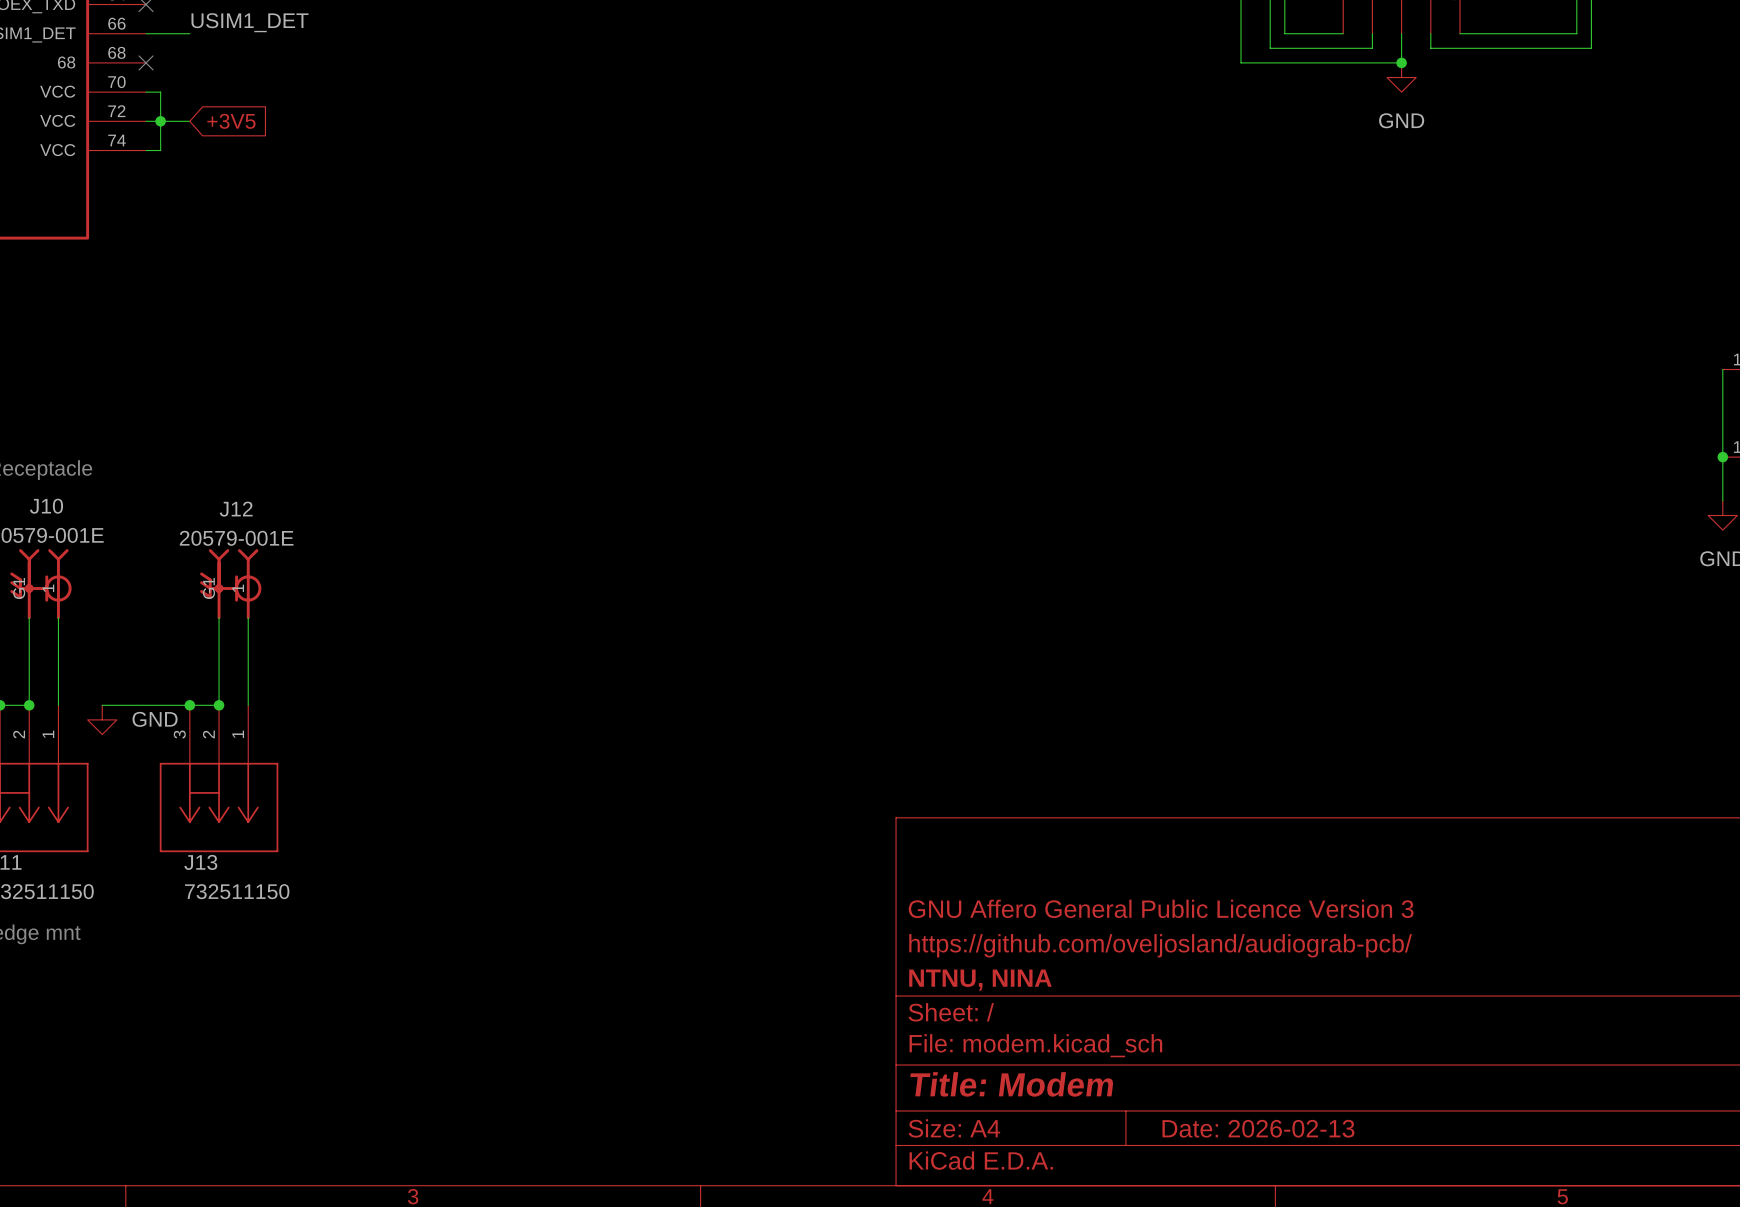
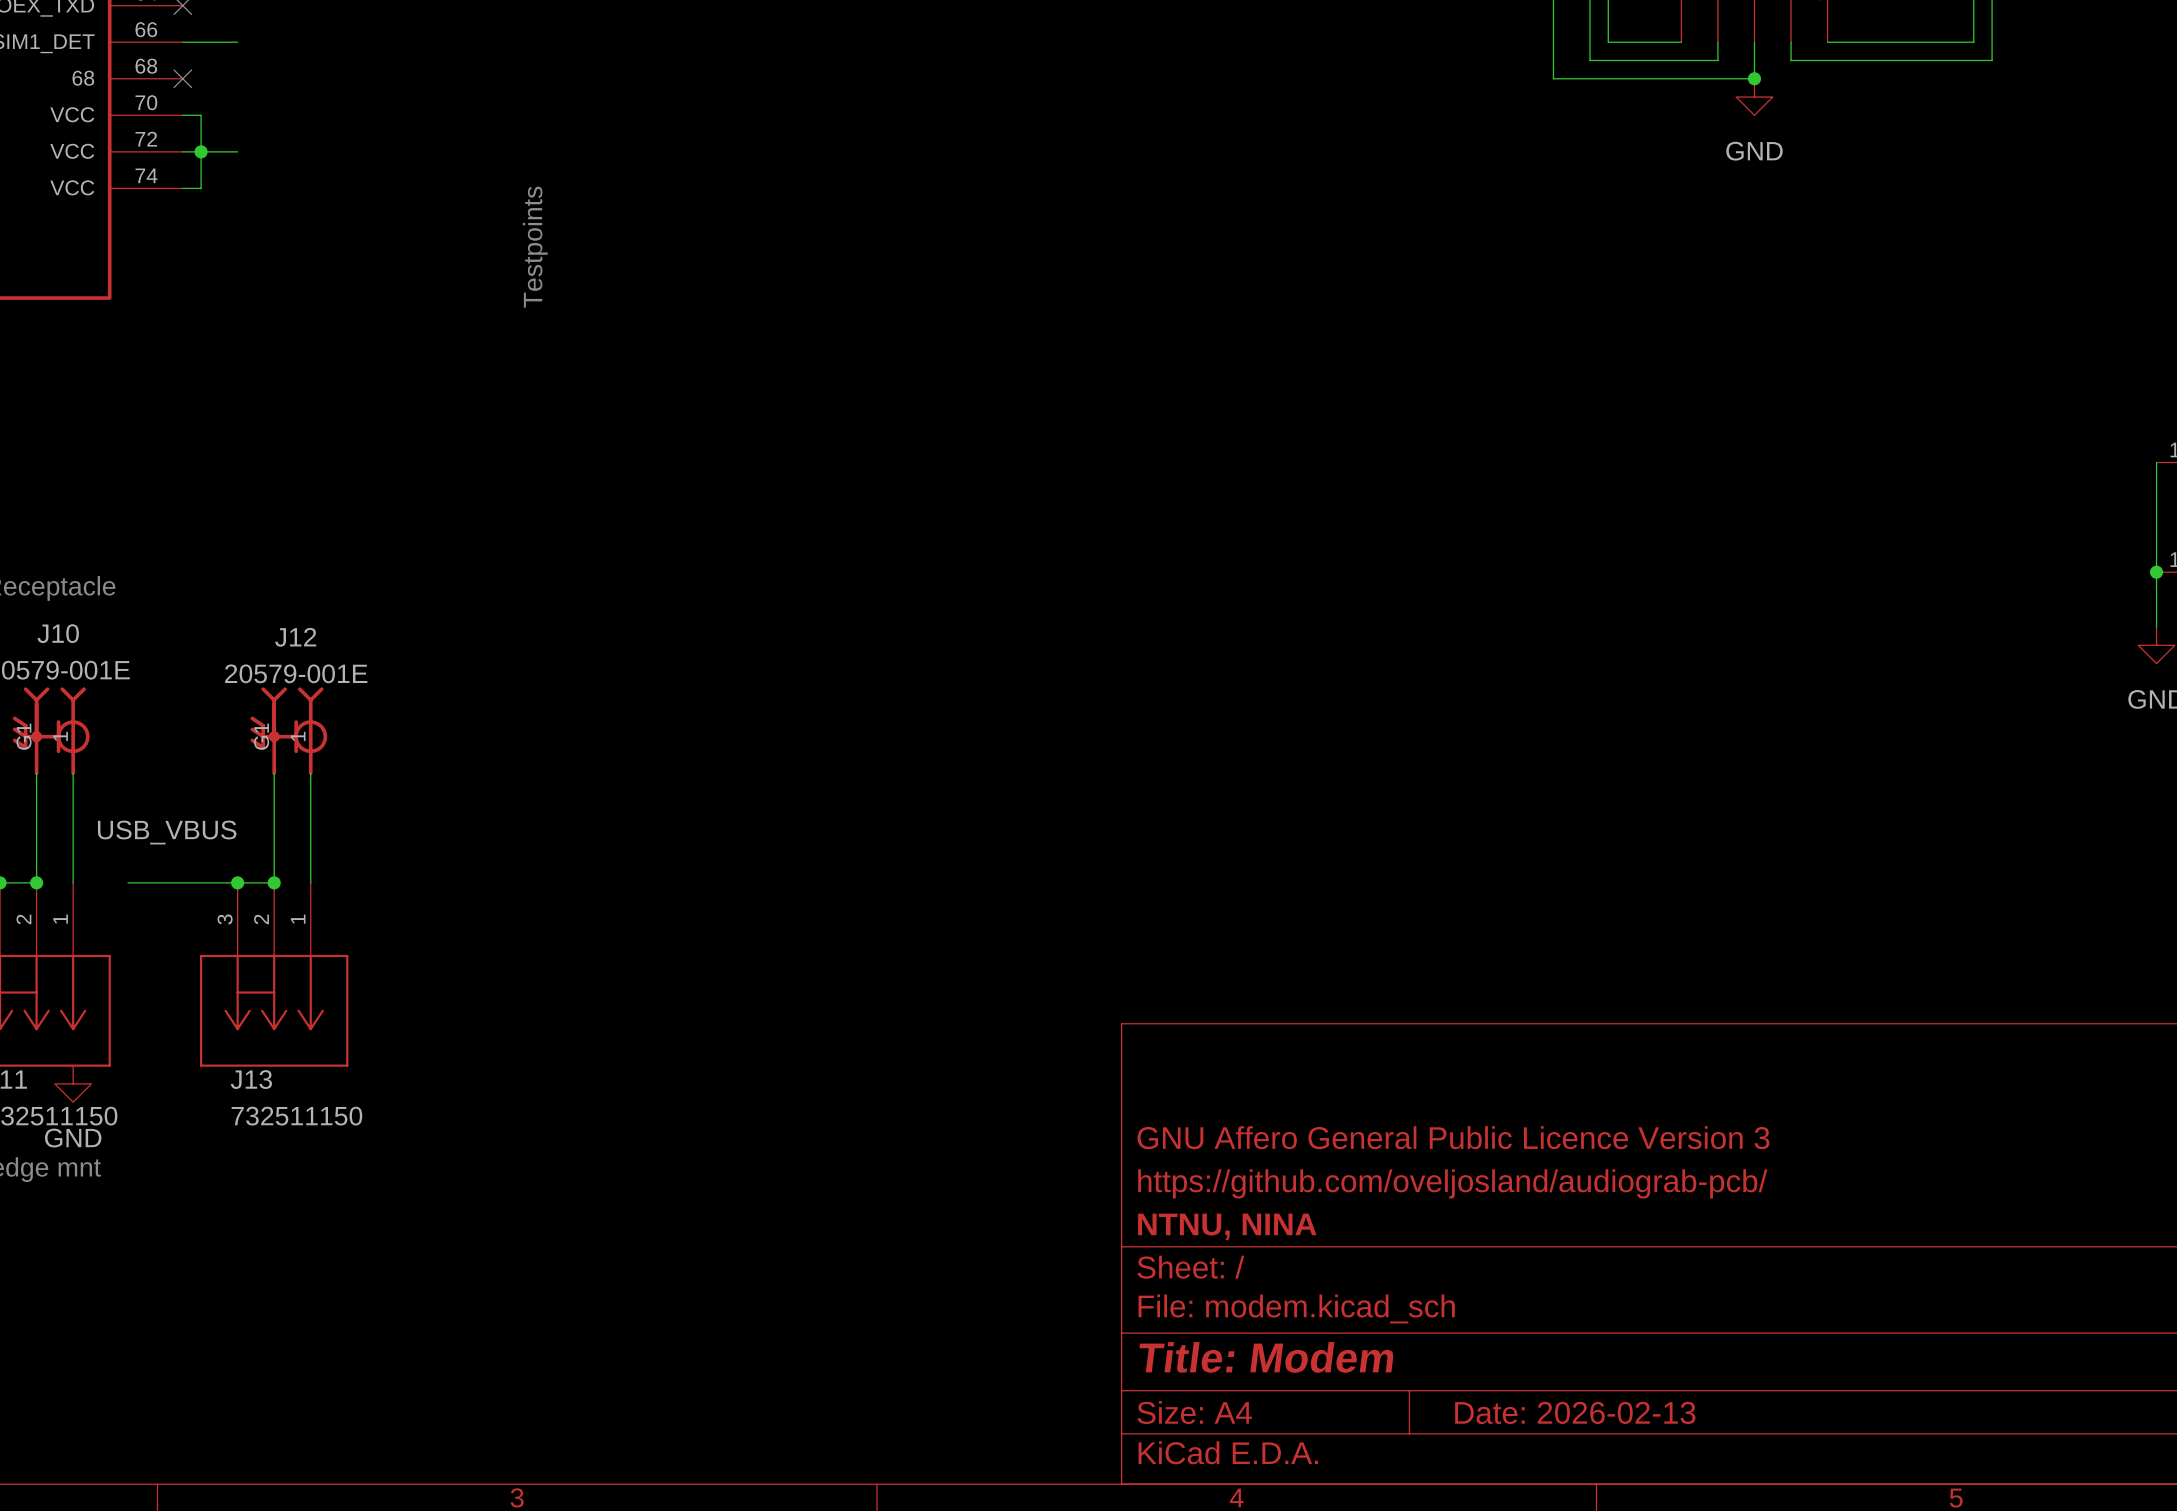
label: USIM1_DET (249, 22) -> none
global label: +3V5 (231, 121) -> none
text: none -> Testpoints (535, 247)
label: none -> USB_VBUS (167, 832)
power symbol: GND (102, 719) -> none
power symbol: none -> GND (73, 1083)

